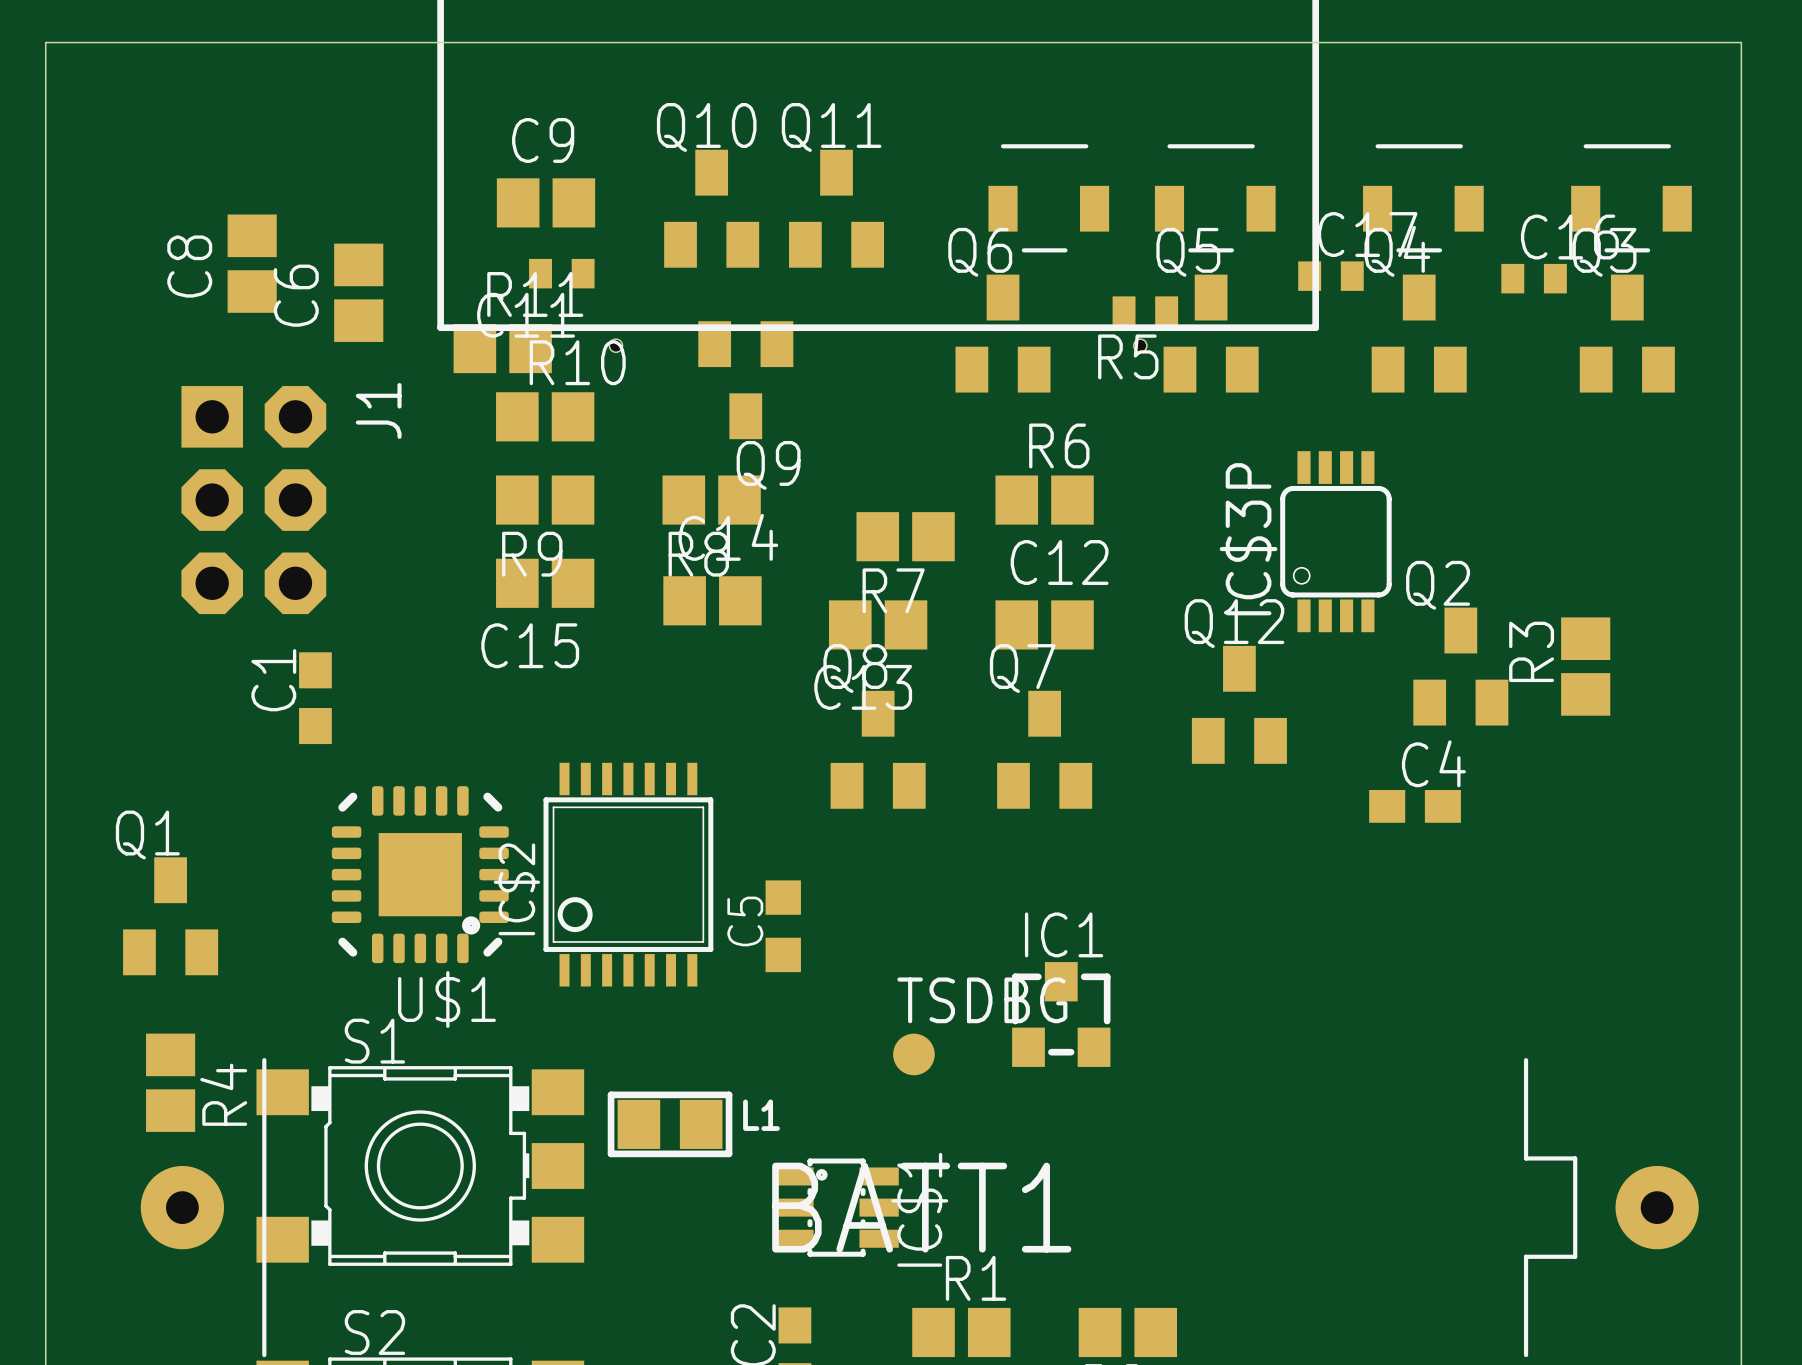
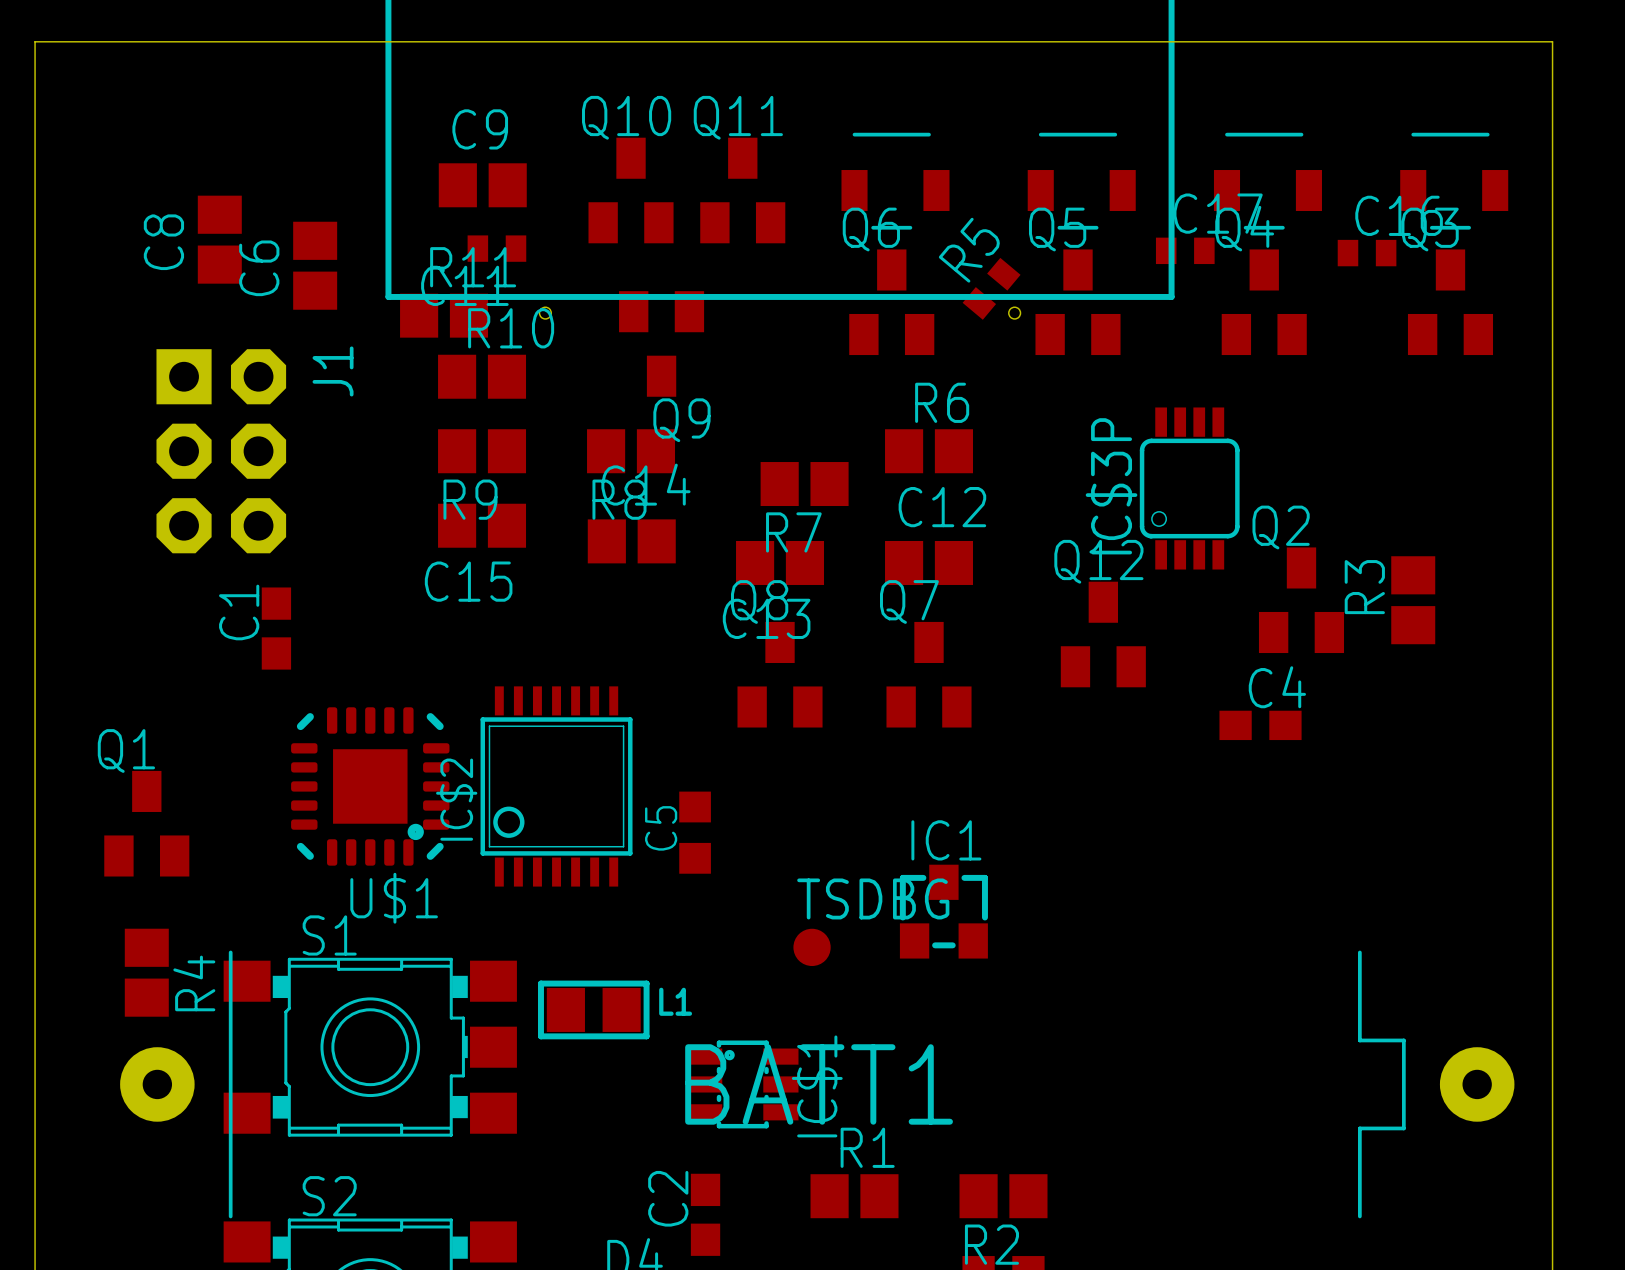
part position: (1048, 198) -> (895, 181)
R5 rotation: 0° (1145, 311) -> 50° counterclockwise (991, 288)
R5 name position: R5 (1128, 356) -> R5 (969, 250)

